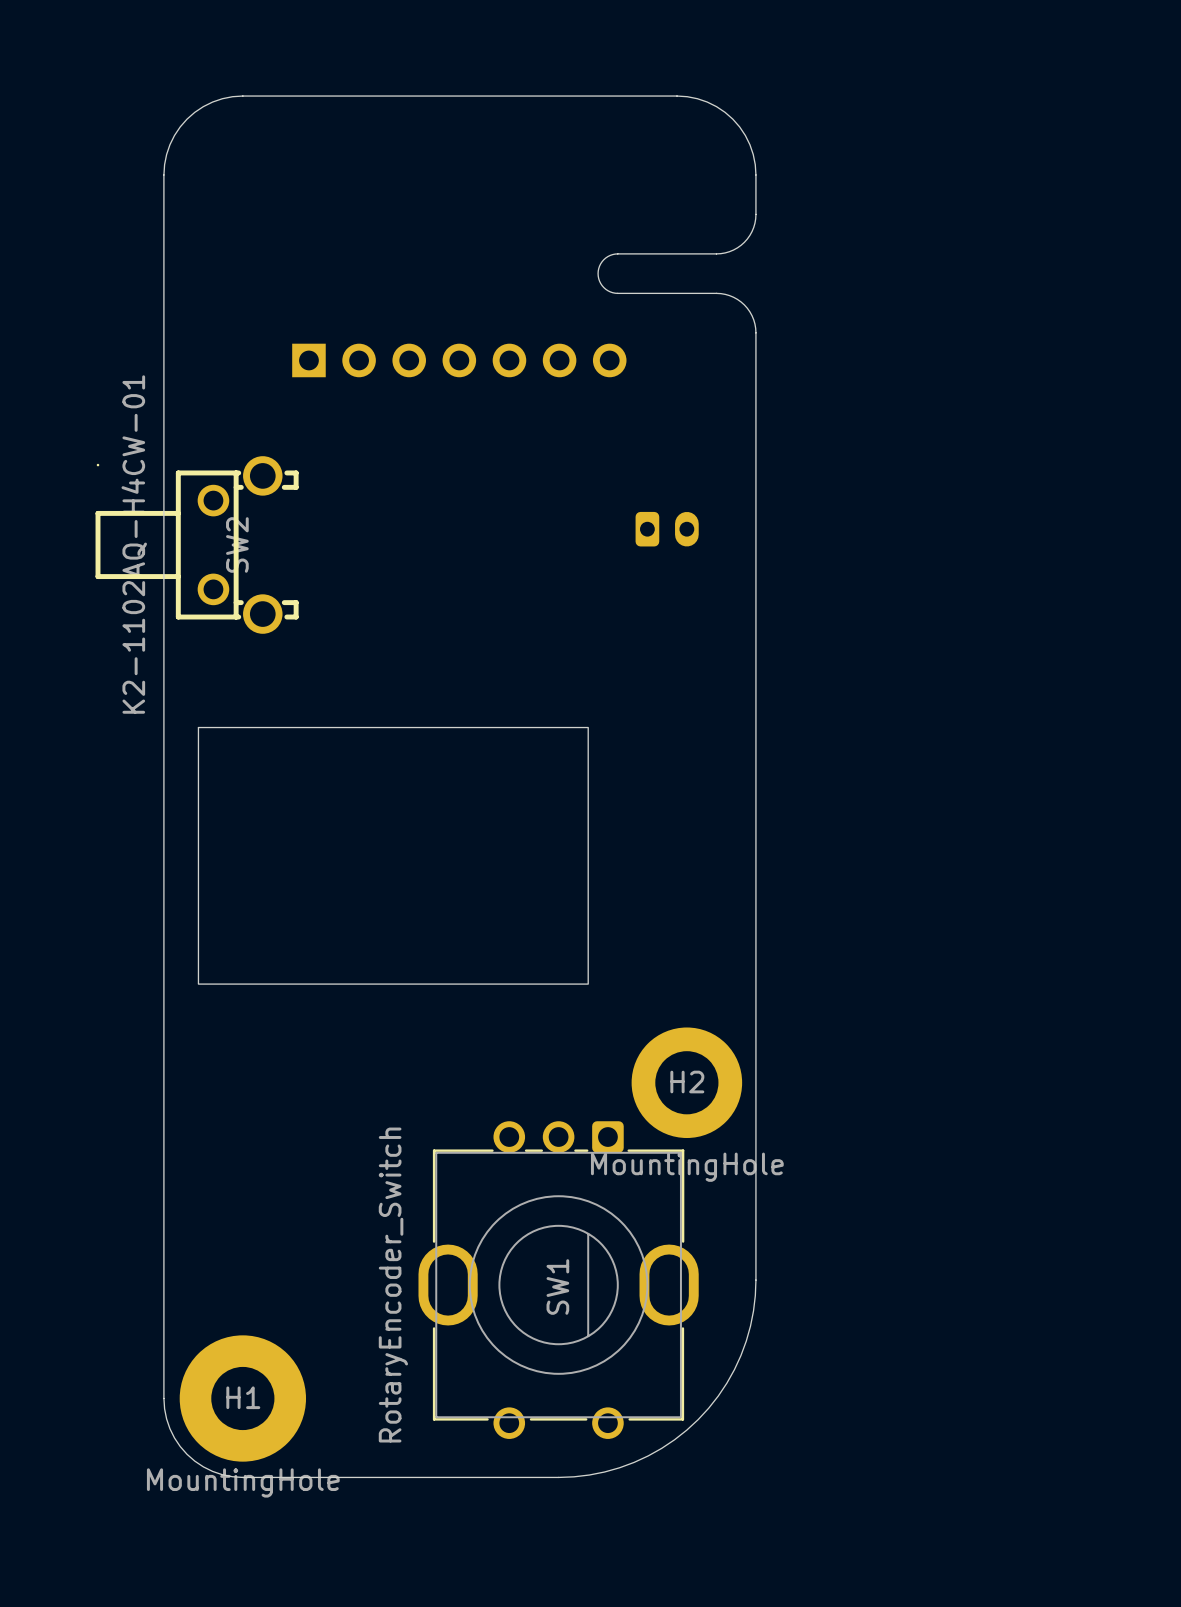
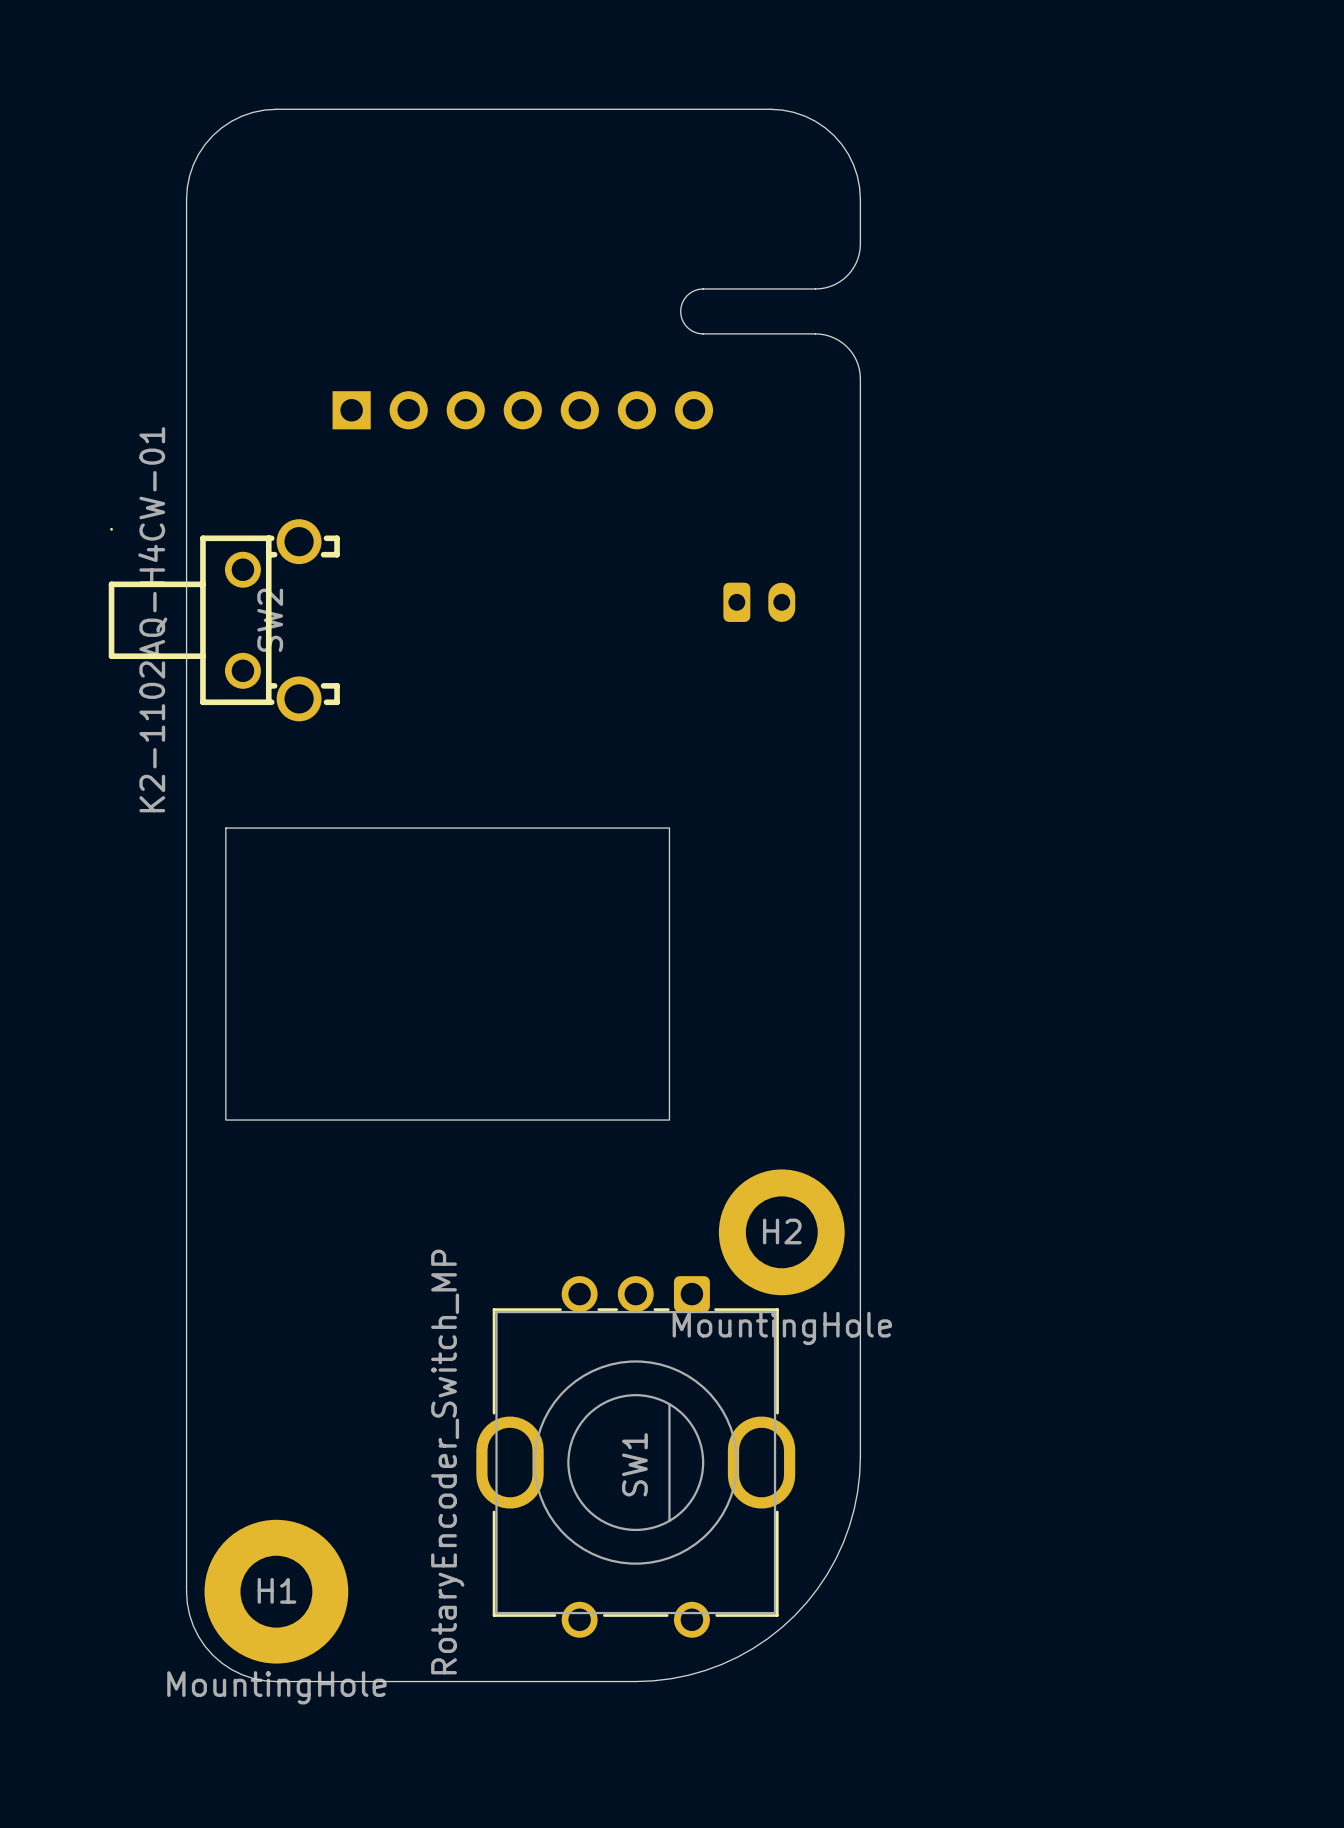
SW1 value: RotaryEncoder_Switch (393, 1285) -> RotaryEncoder_Switch_MP (447, 1462)

